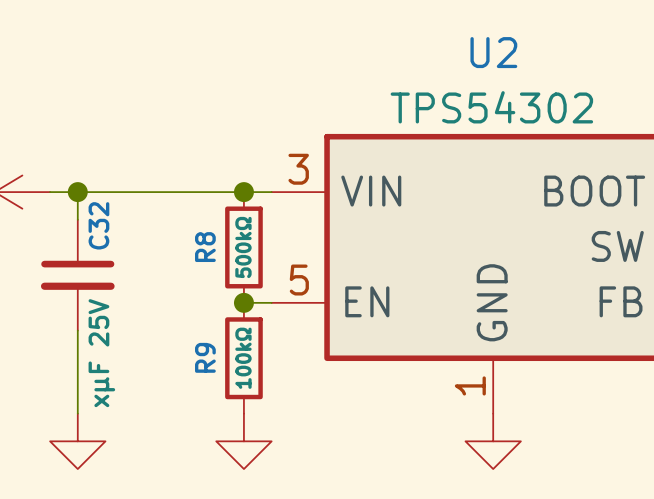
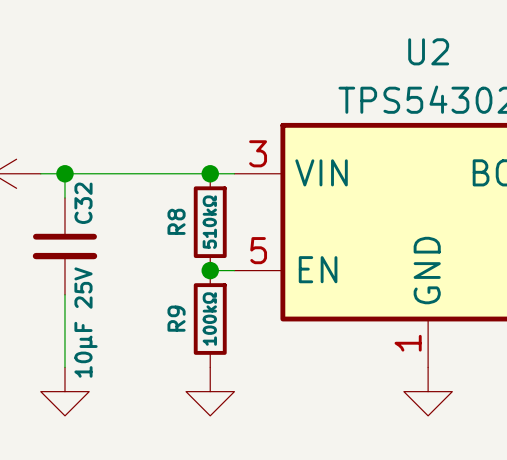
R8 value: 500kΩ (243, 247) -> 510kΩ (209, 222)
C32 value: xµF 25V (101, 353) -> 10µF 25V (86, 322)

